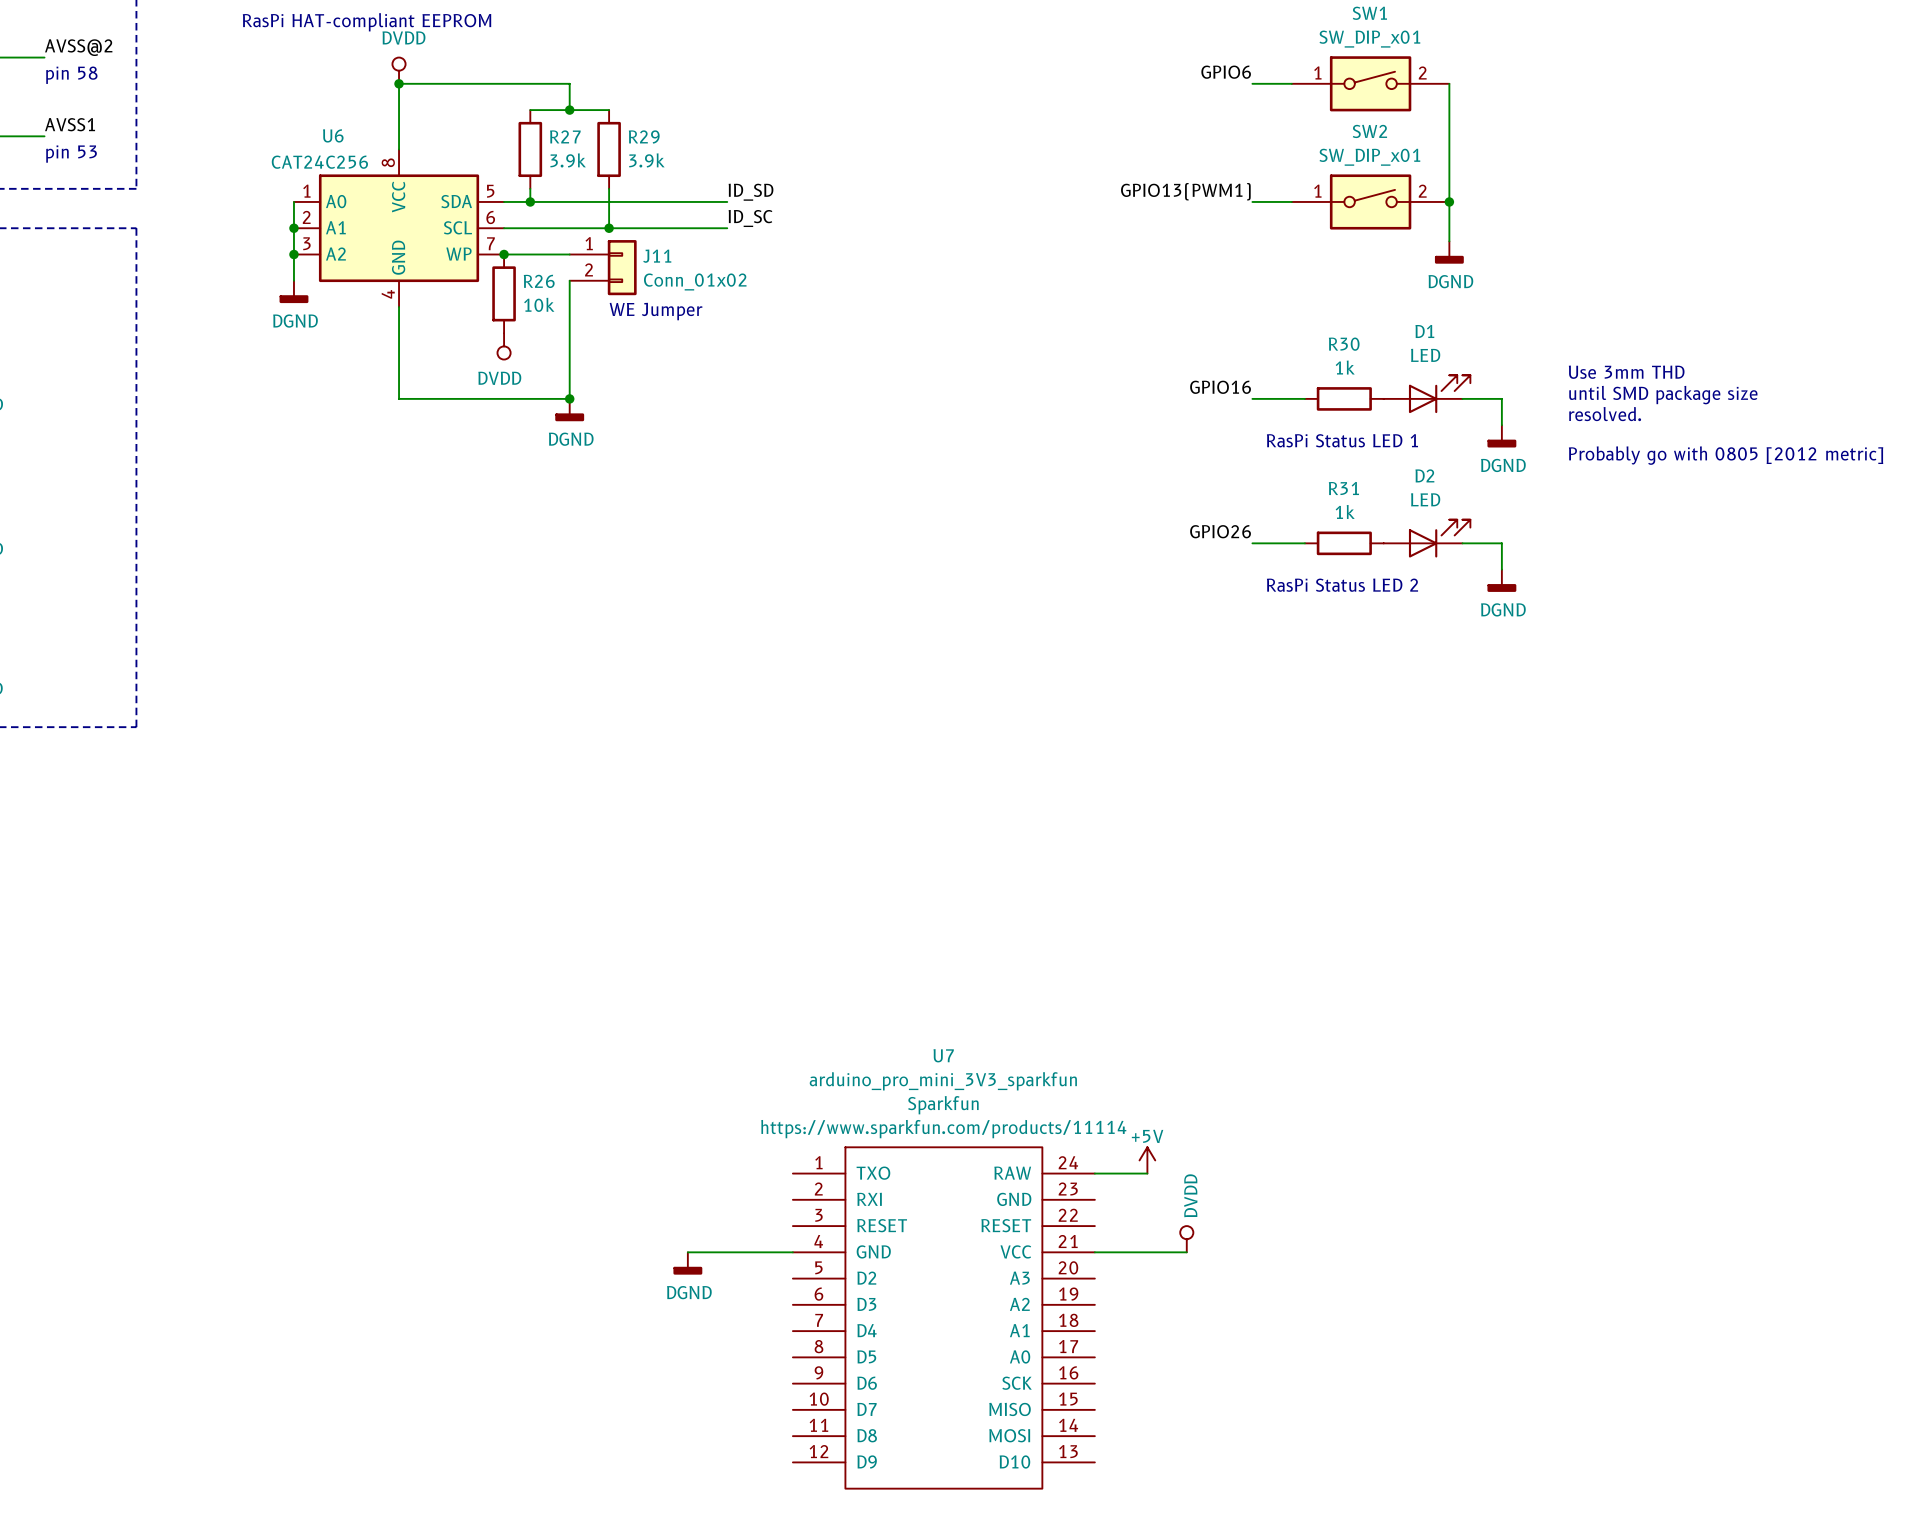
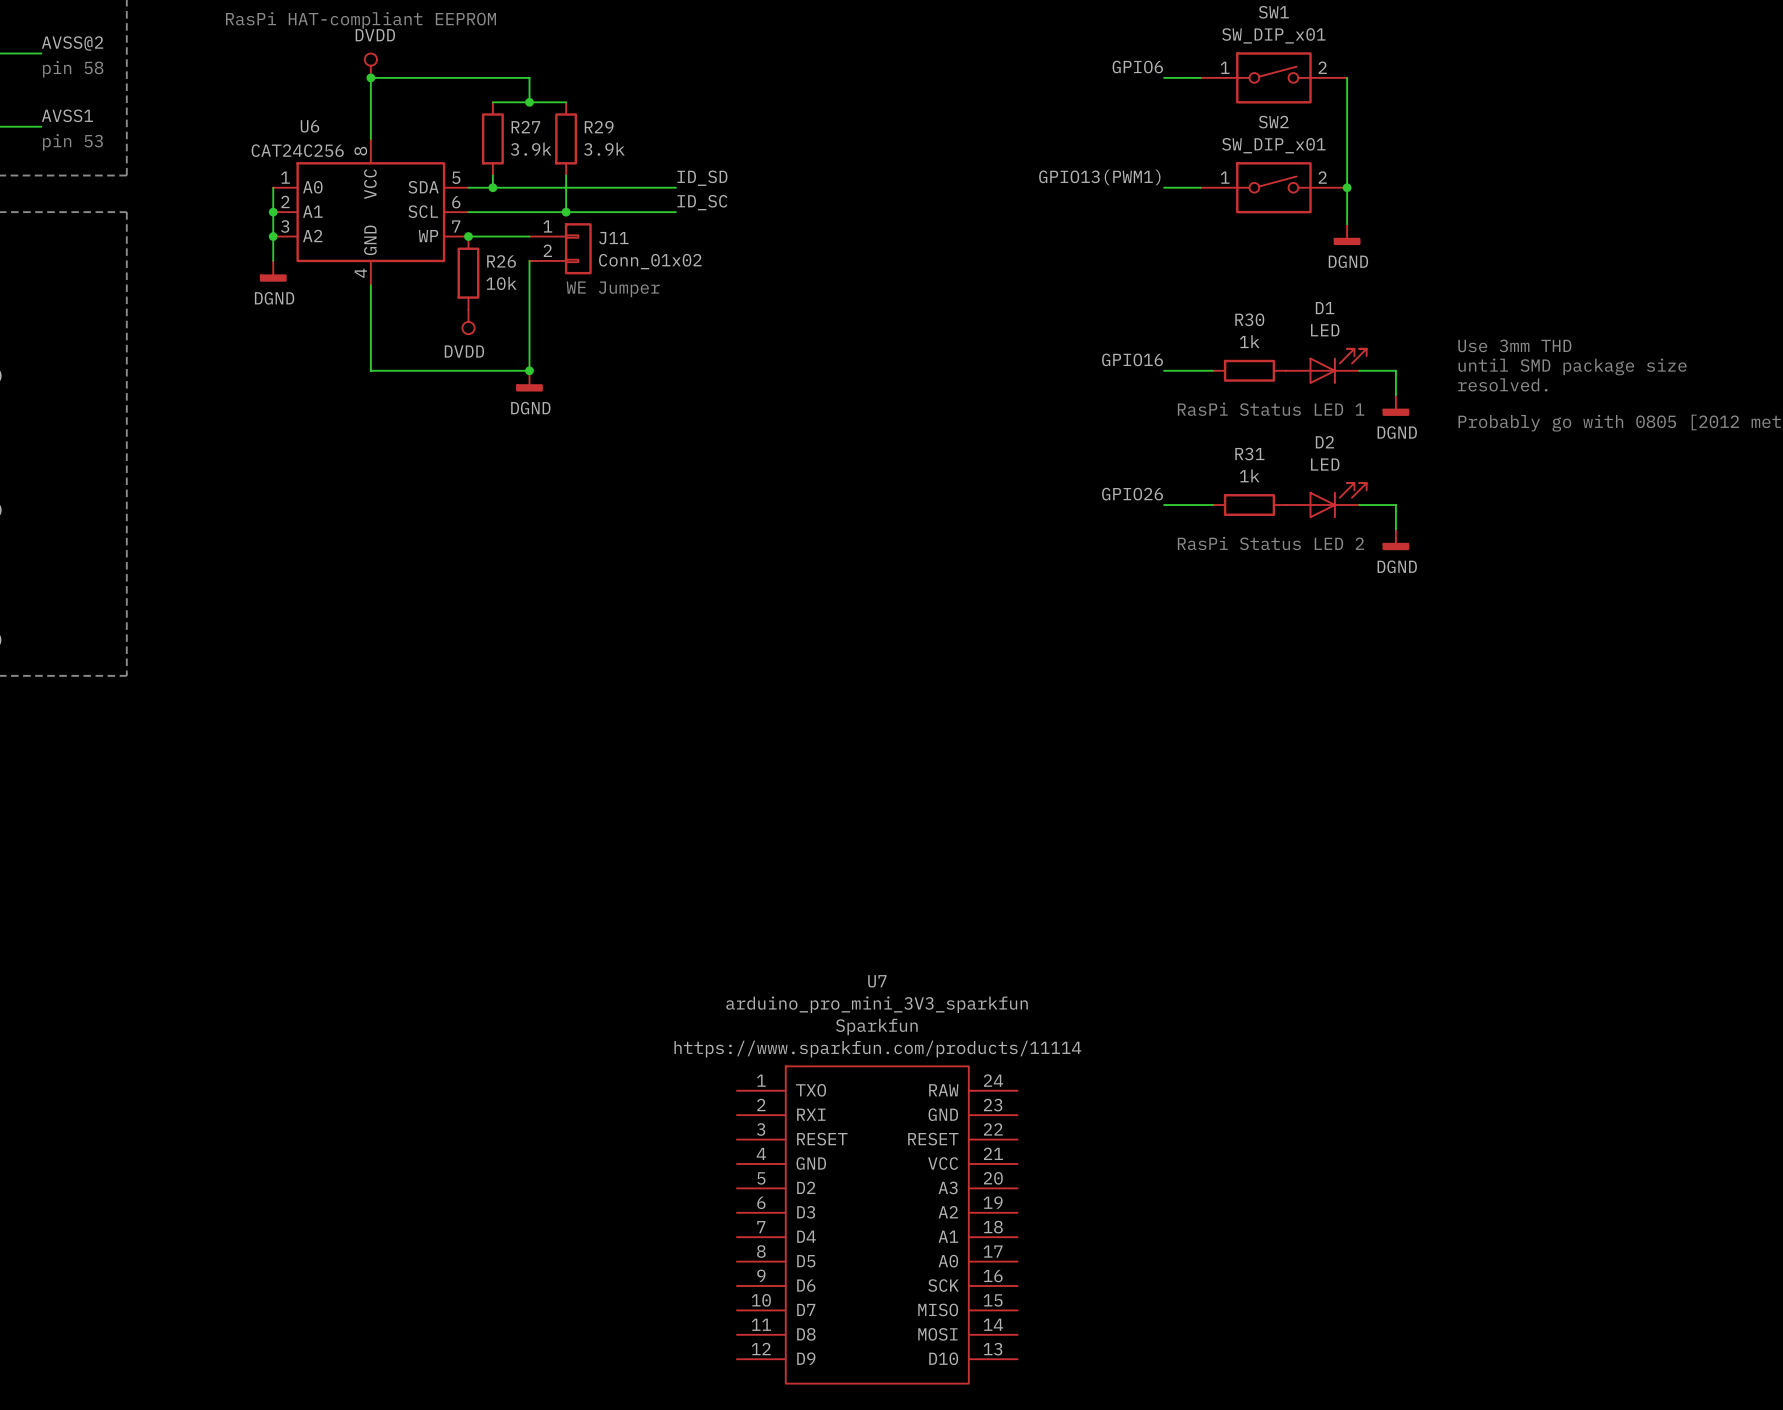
power symbol: +5V (1147, 1160) -> none
wire: (1094, 1173) (1147, 1173) -> none
power symbol: DVDD (1186, 1239) -> none
wire: (687, 1252) (792, 1252) -> none
wire: (1094, 1252) (1186, 1252) -> none
power symbol: DGND (687, 1263) -> none

